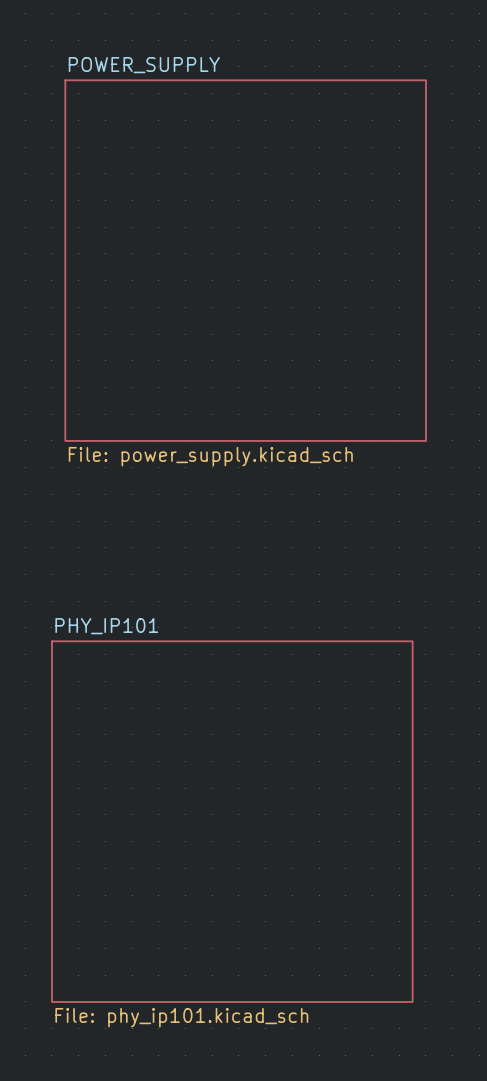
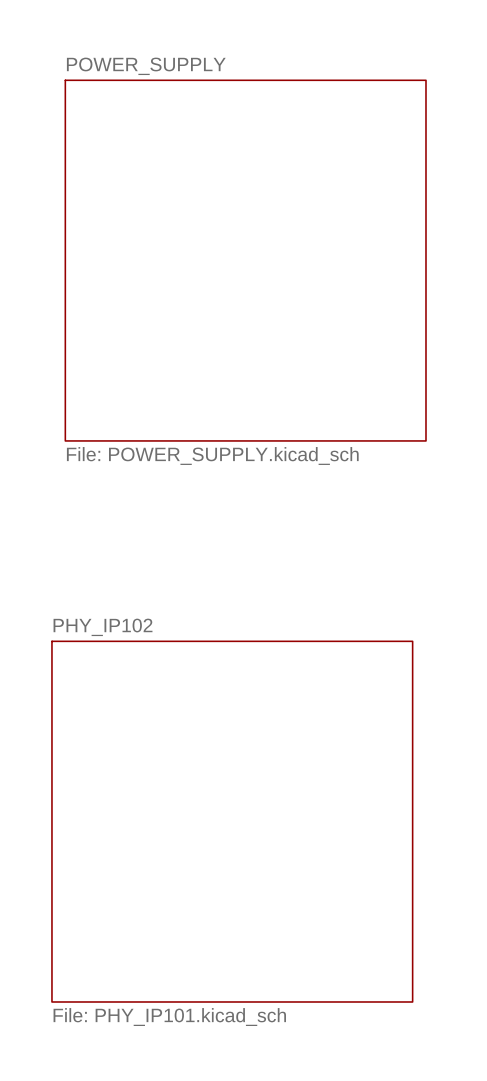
sheet POWER_SUPPLY value: File: power_supply.kicad_sch (210, 456) -> File: POWER_SUPPLY.kicad_sch (212, 455)
sheet PHY_IP101 name: PHY_IP101 (106, 626) -> PHY_IP102 (103, 627)
sheet PHY_IP101 value: File: phy_ip101.kicad_sch (181, 1017) -> File: PHY_IP101.kicad_sch (169, 1017)

